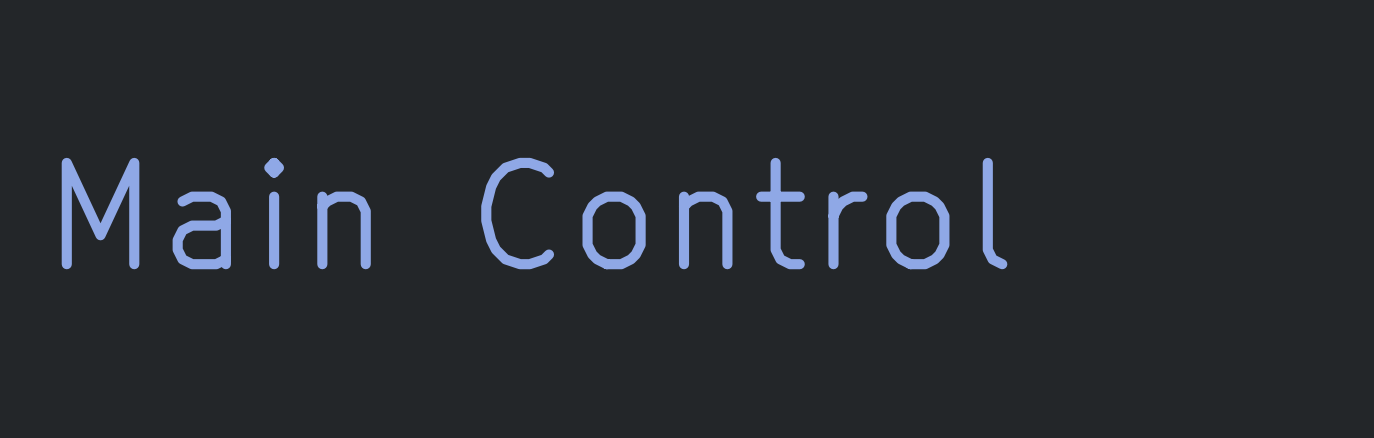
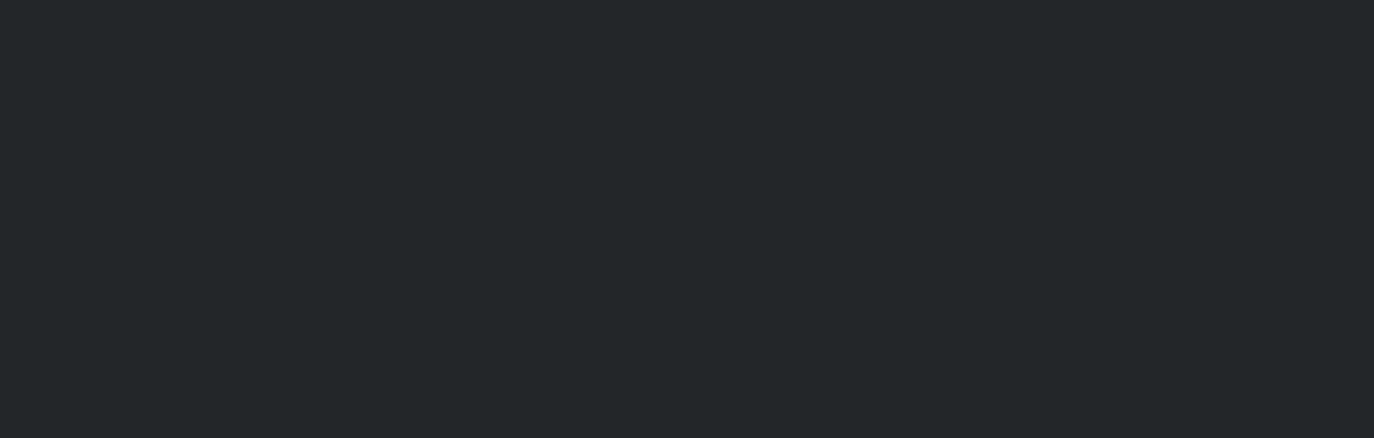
text: Main Control (534, 213) -> none

